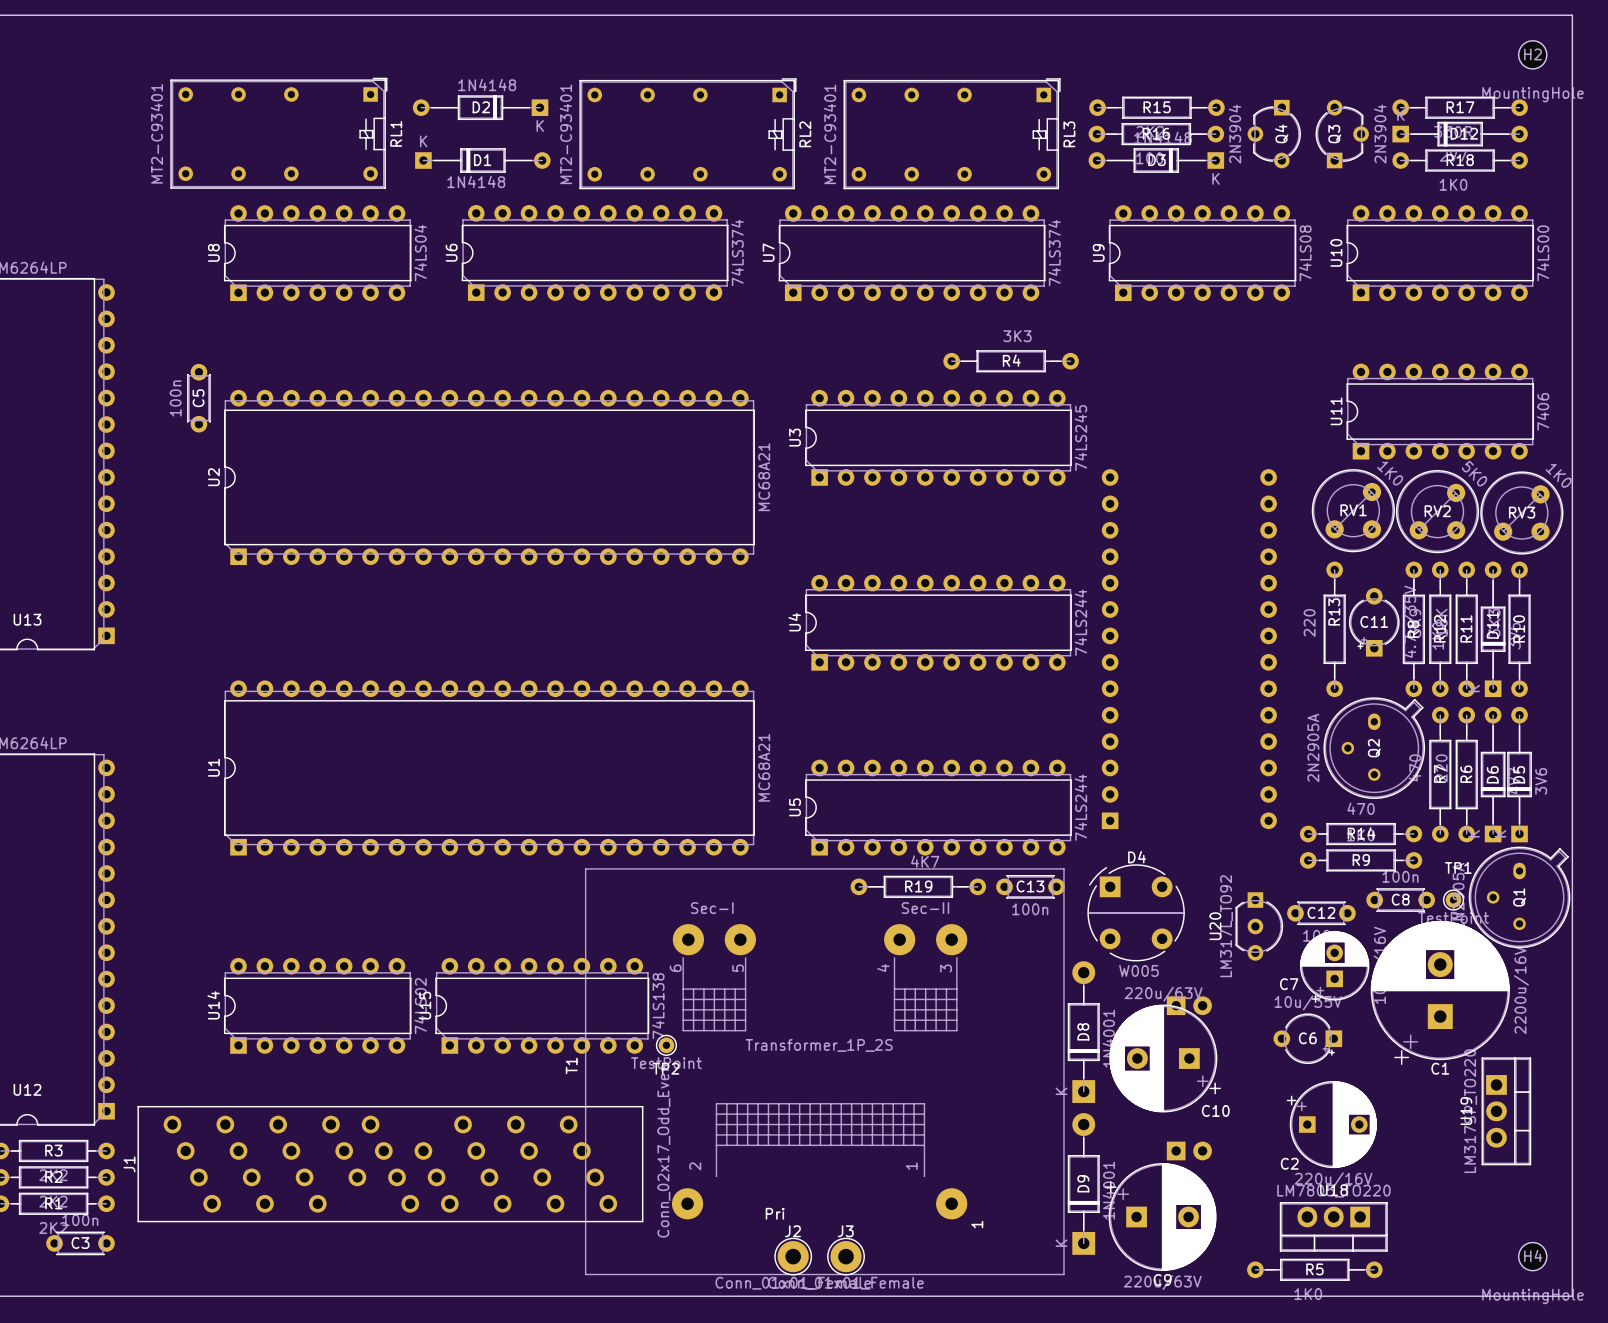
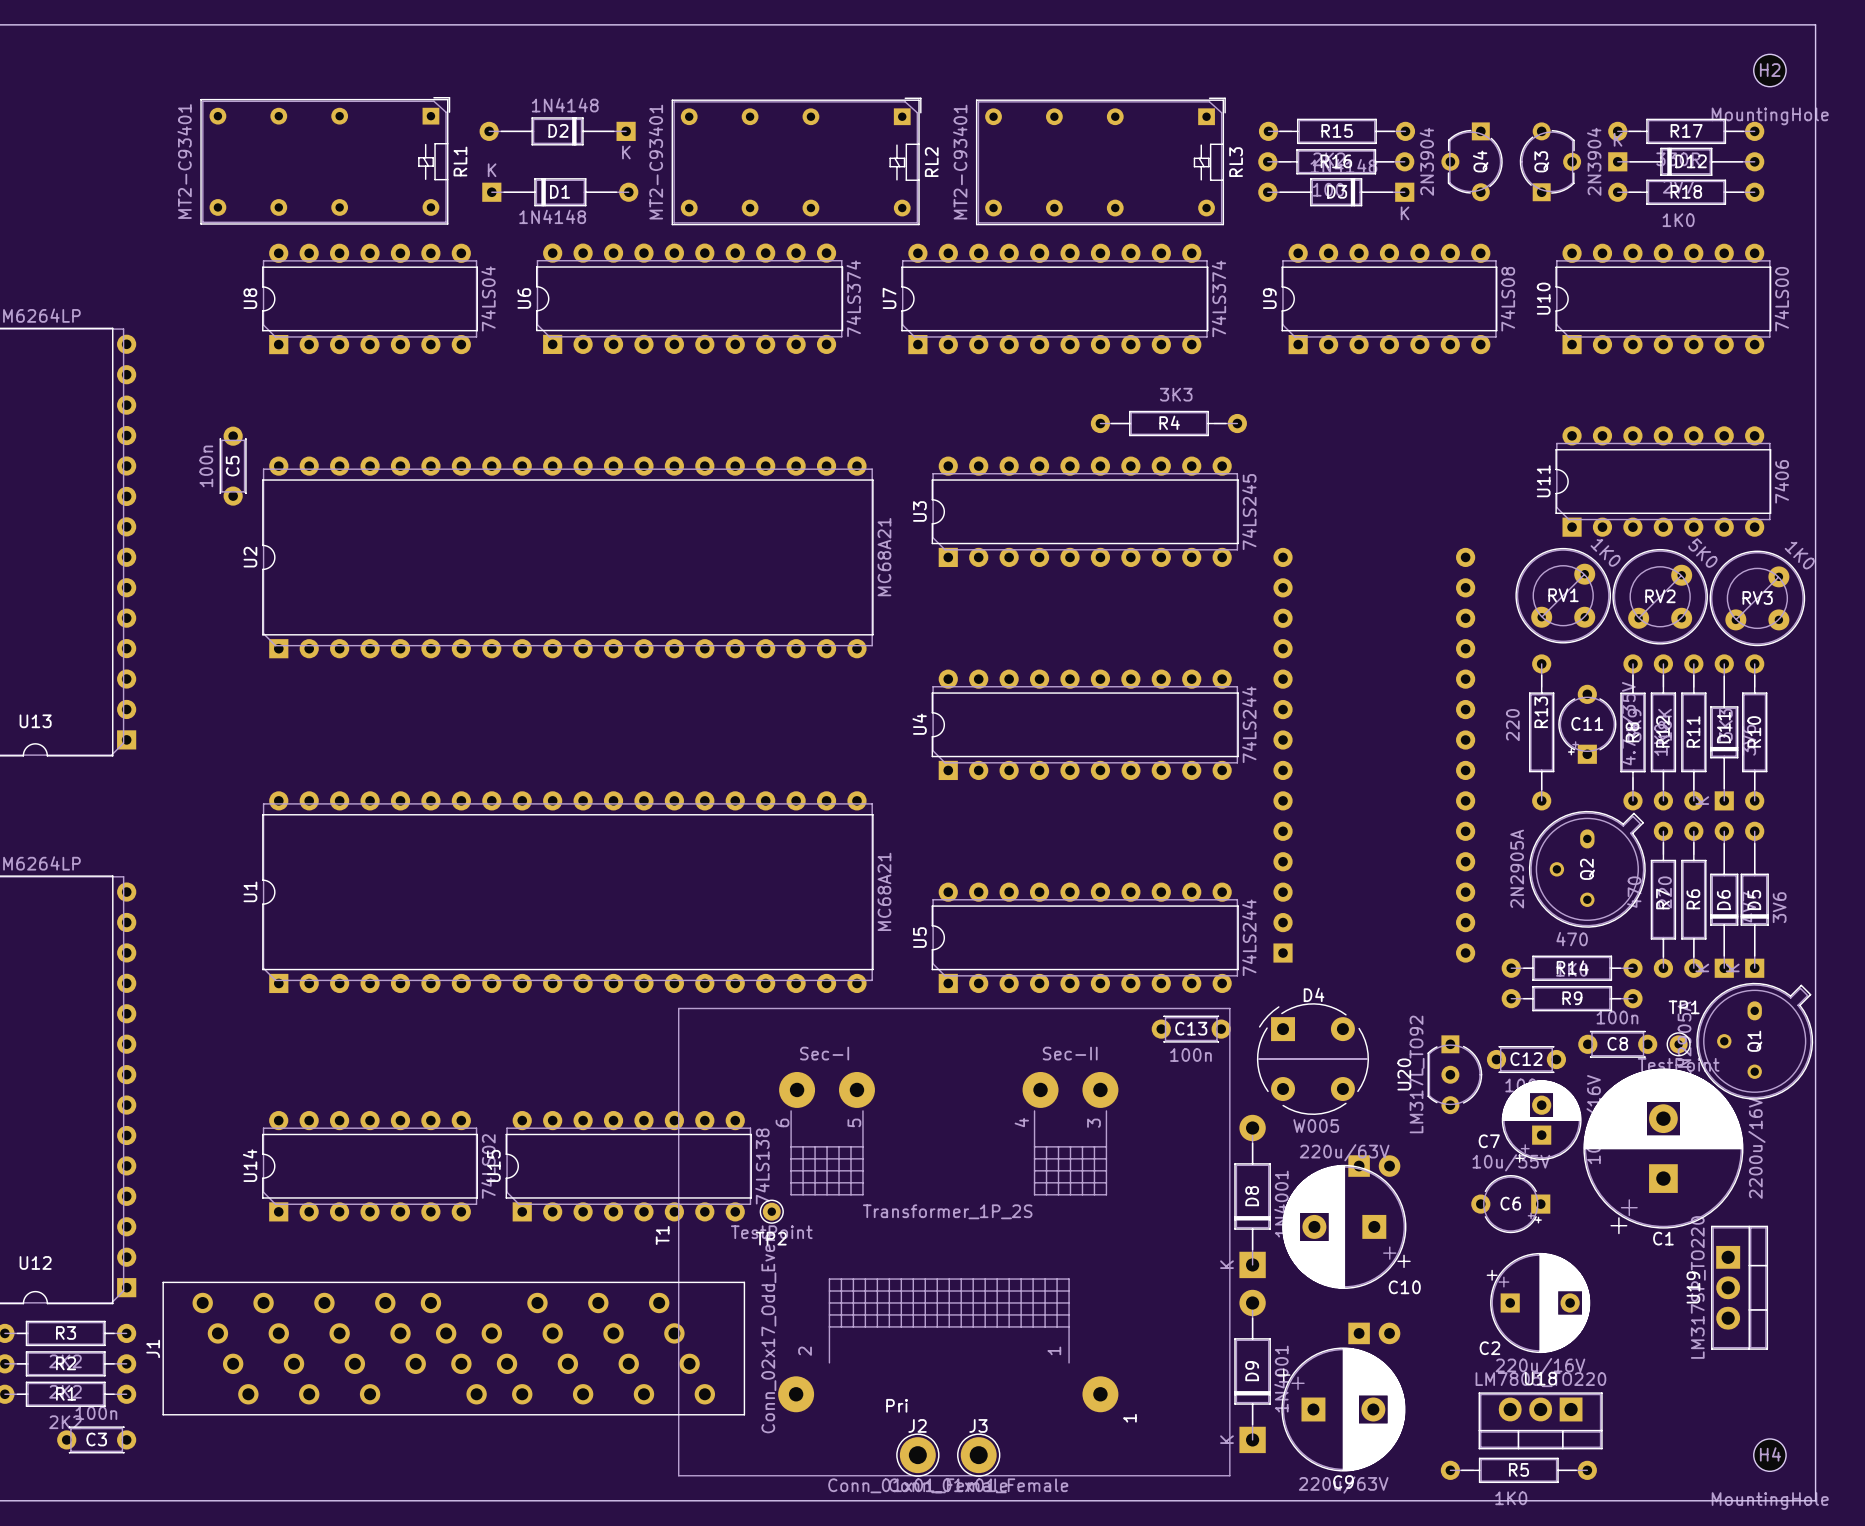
R19: 4K7 (918, 886) -> none

